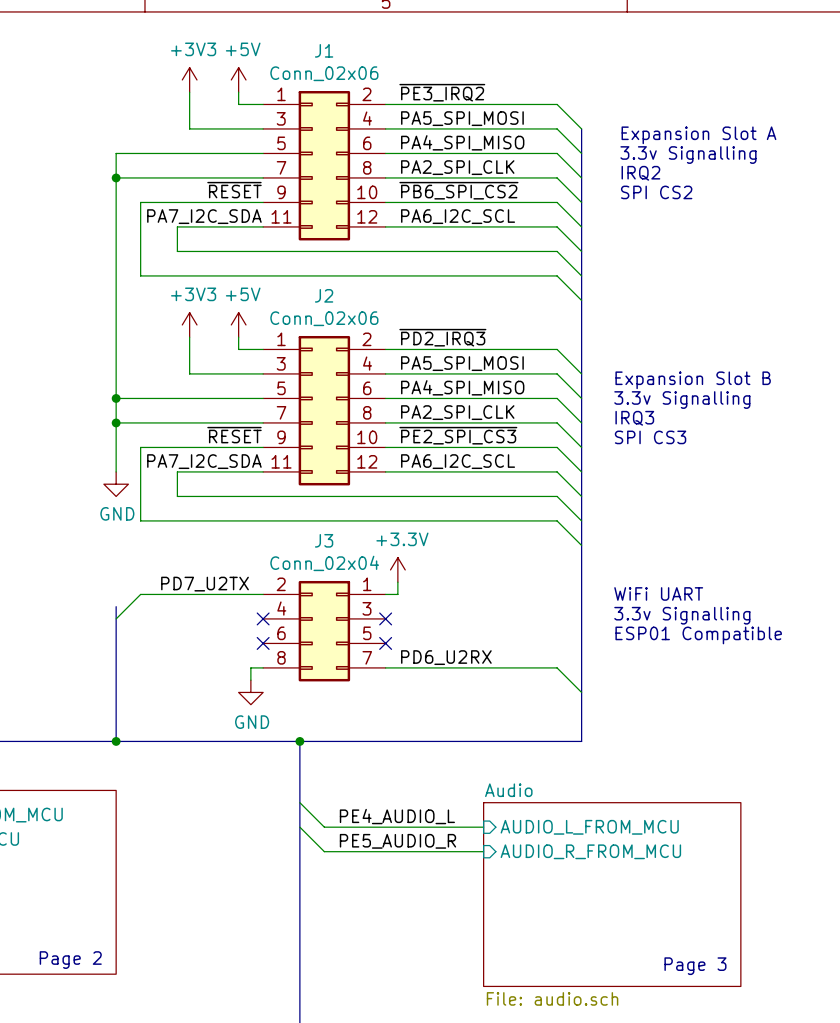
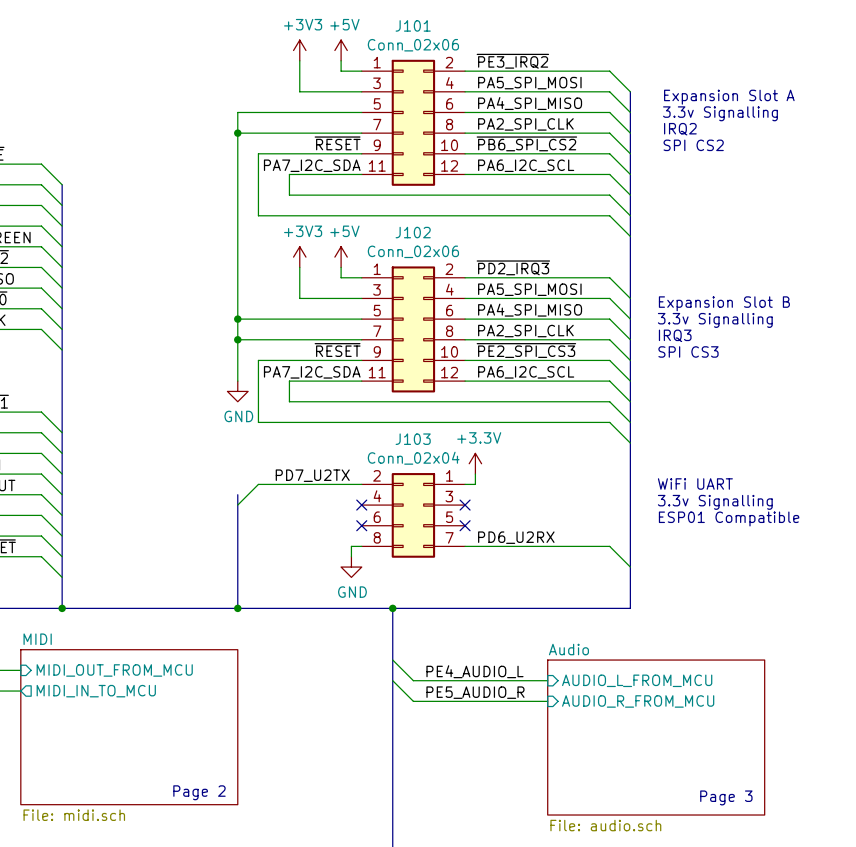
J1 name: J1 (324, 50) -> J101 (413, 25)
J2 name: J2 (324, 295) -> J102 (413, 232)
J3 name: J3 (324, 540) -> J103 (413, 439)

